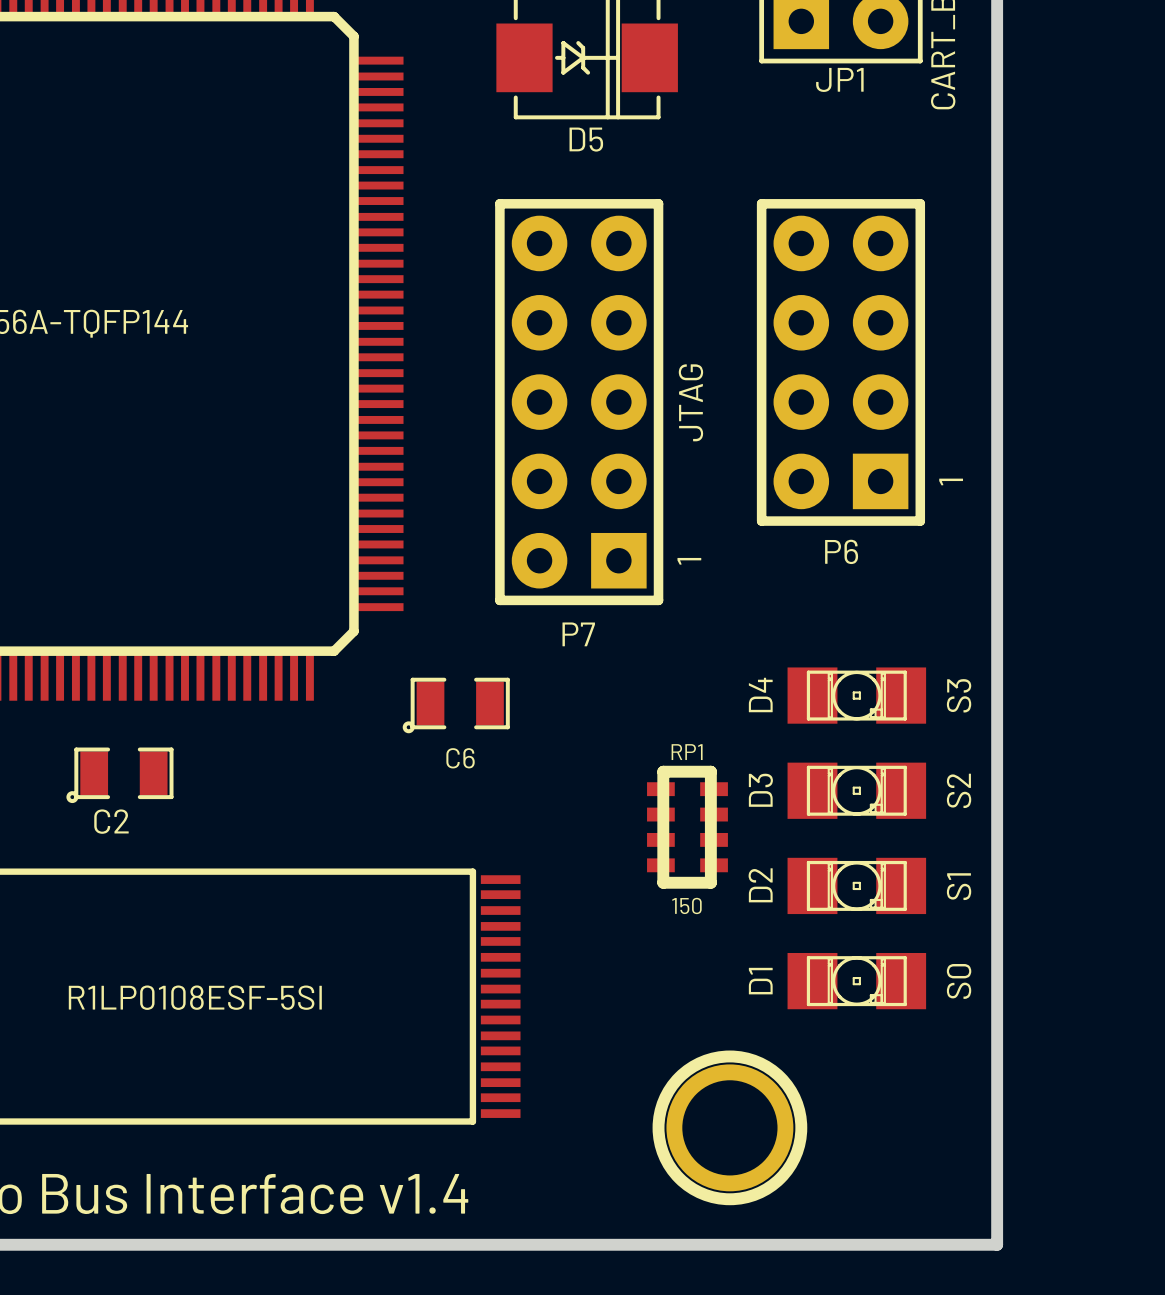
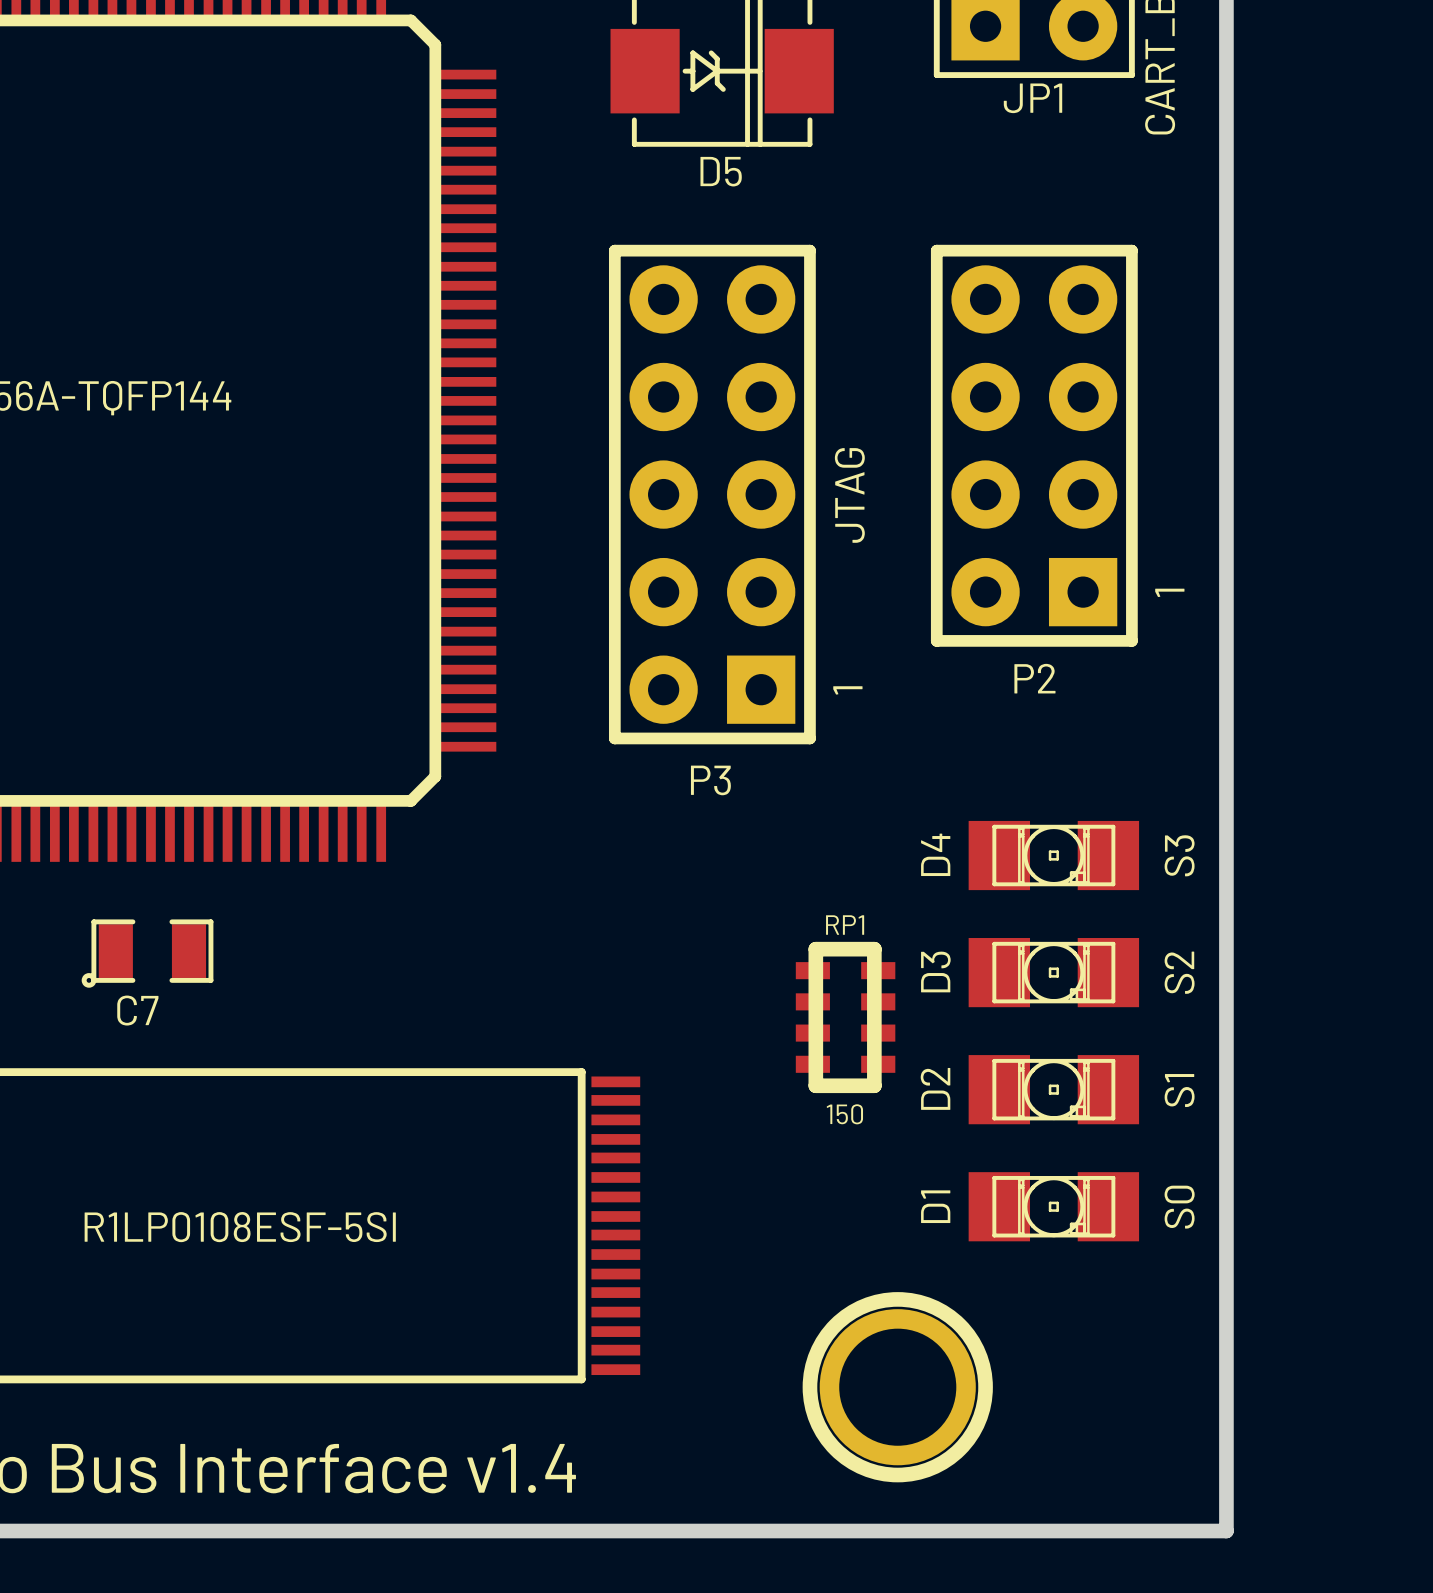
P6 name: P6 (841, 551) -> P2 (1034, 678)
P7 name: P7 (578, 634) -> P3 (710, 780)
C6: (456, 705) -> none
C2 name: C2 (111, 821) -> C7 (137, 1010)

